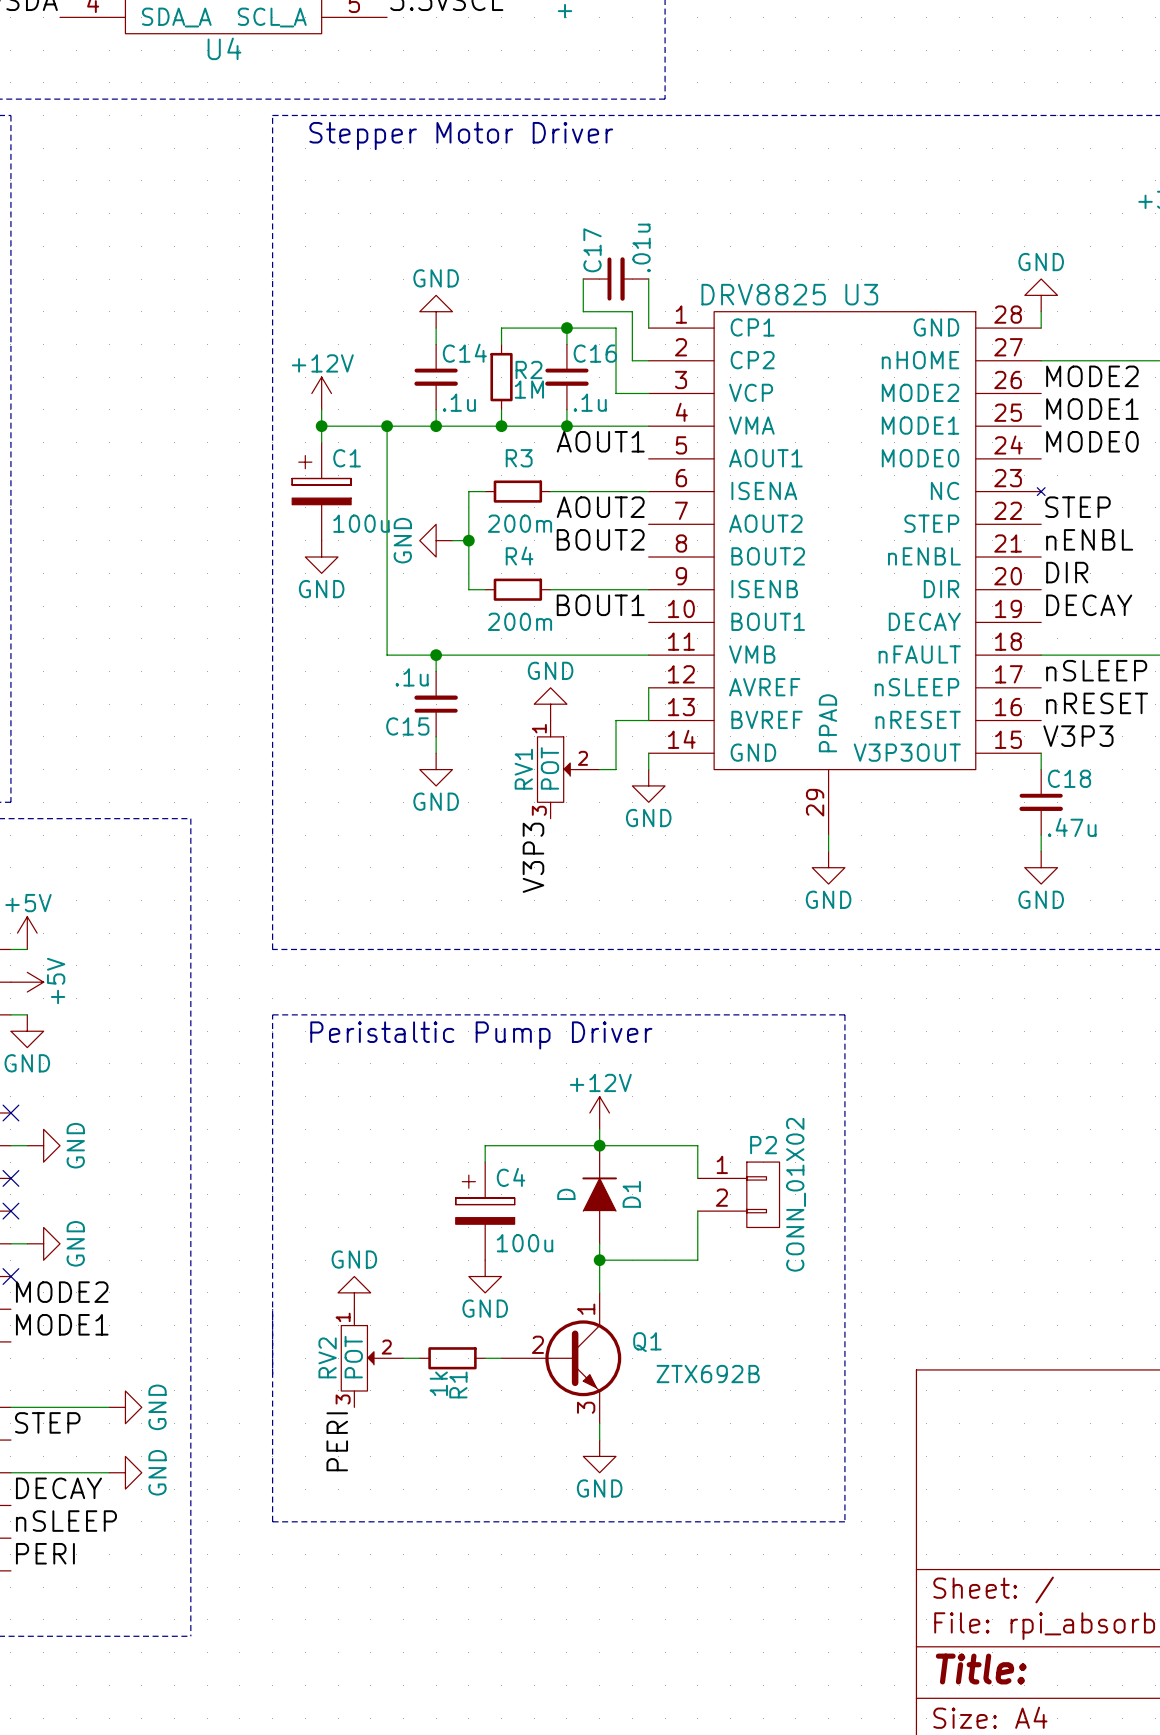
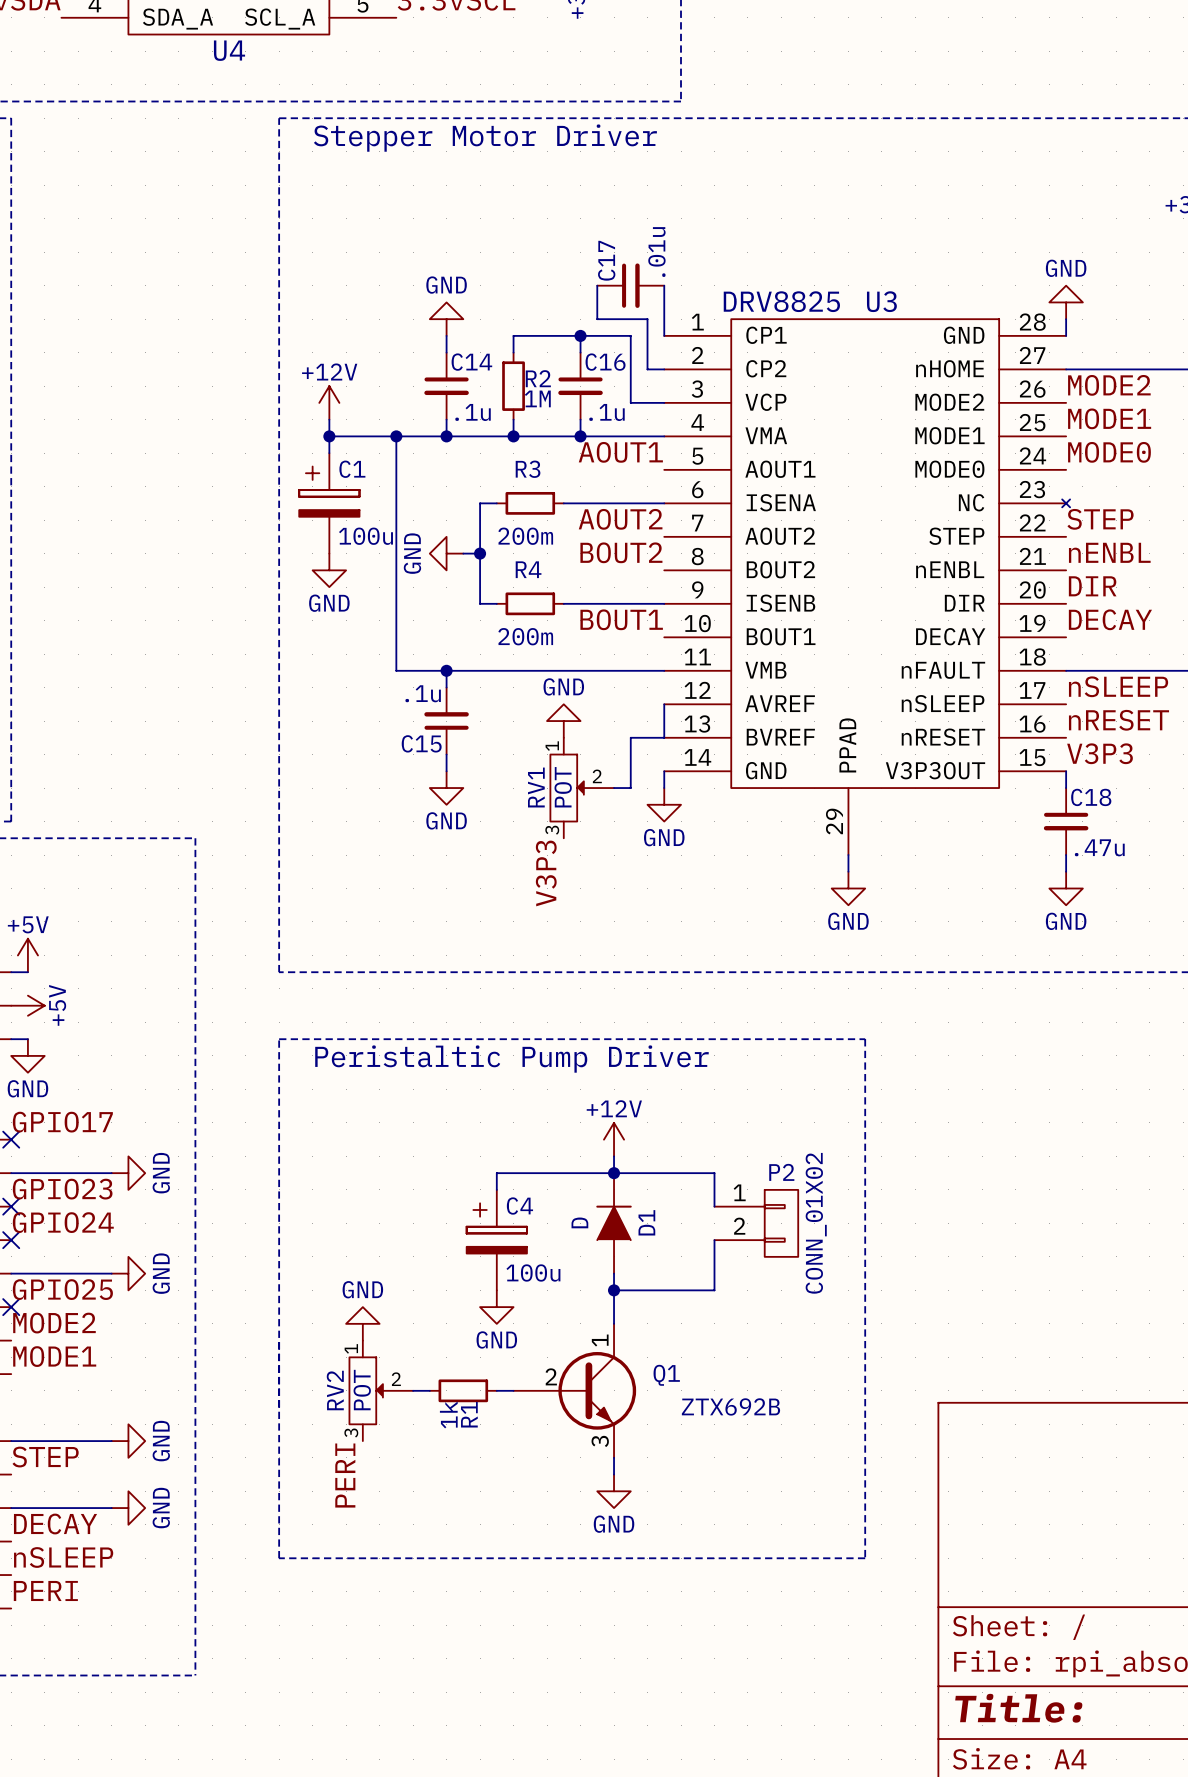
label: none -> GPIO17 (62, 1122)
wire: none -> (27, 1173) (111, 1173)
power symbol: GND (43, 1145) -> none
power symbol: none -> GND (128, 1173)
label: none -> GPIO23 (62, 1189)
label: none -> GPIO24 (63, 1222)
wire: none -> (27, 1273) (111, 1273)
power symbol: GND (43, 1243) -> none
power symbol: none -> GND (128, 1273)
label: none -> GPIO25 (62, 1289)

